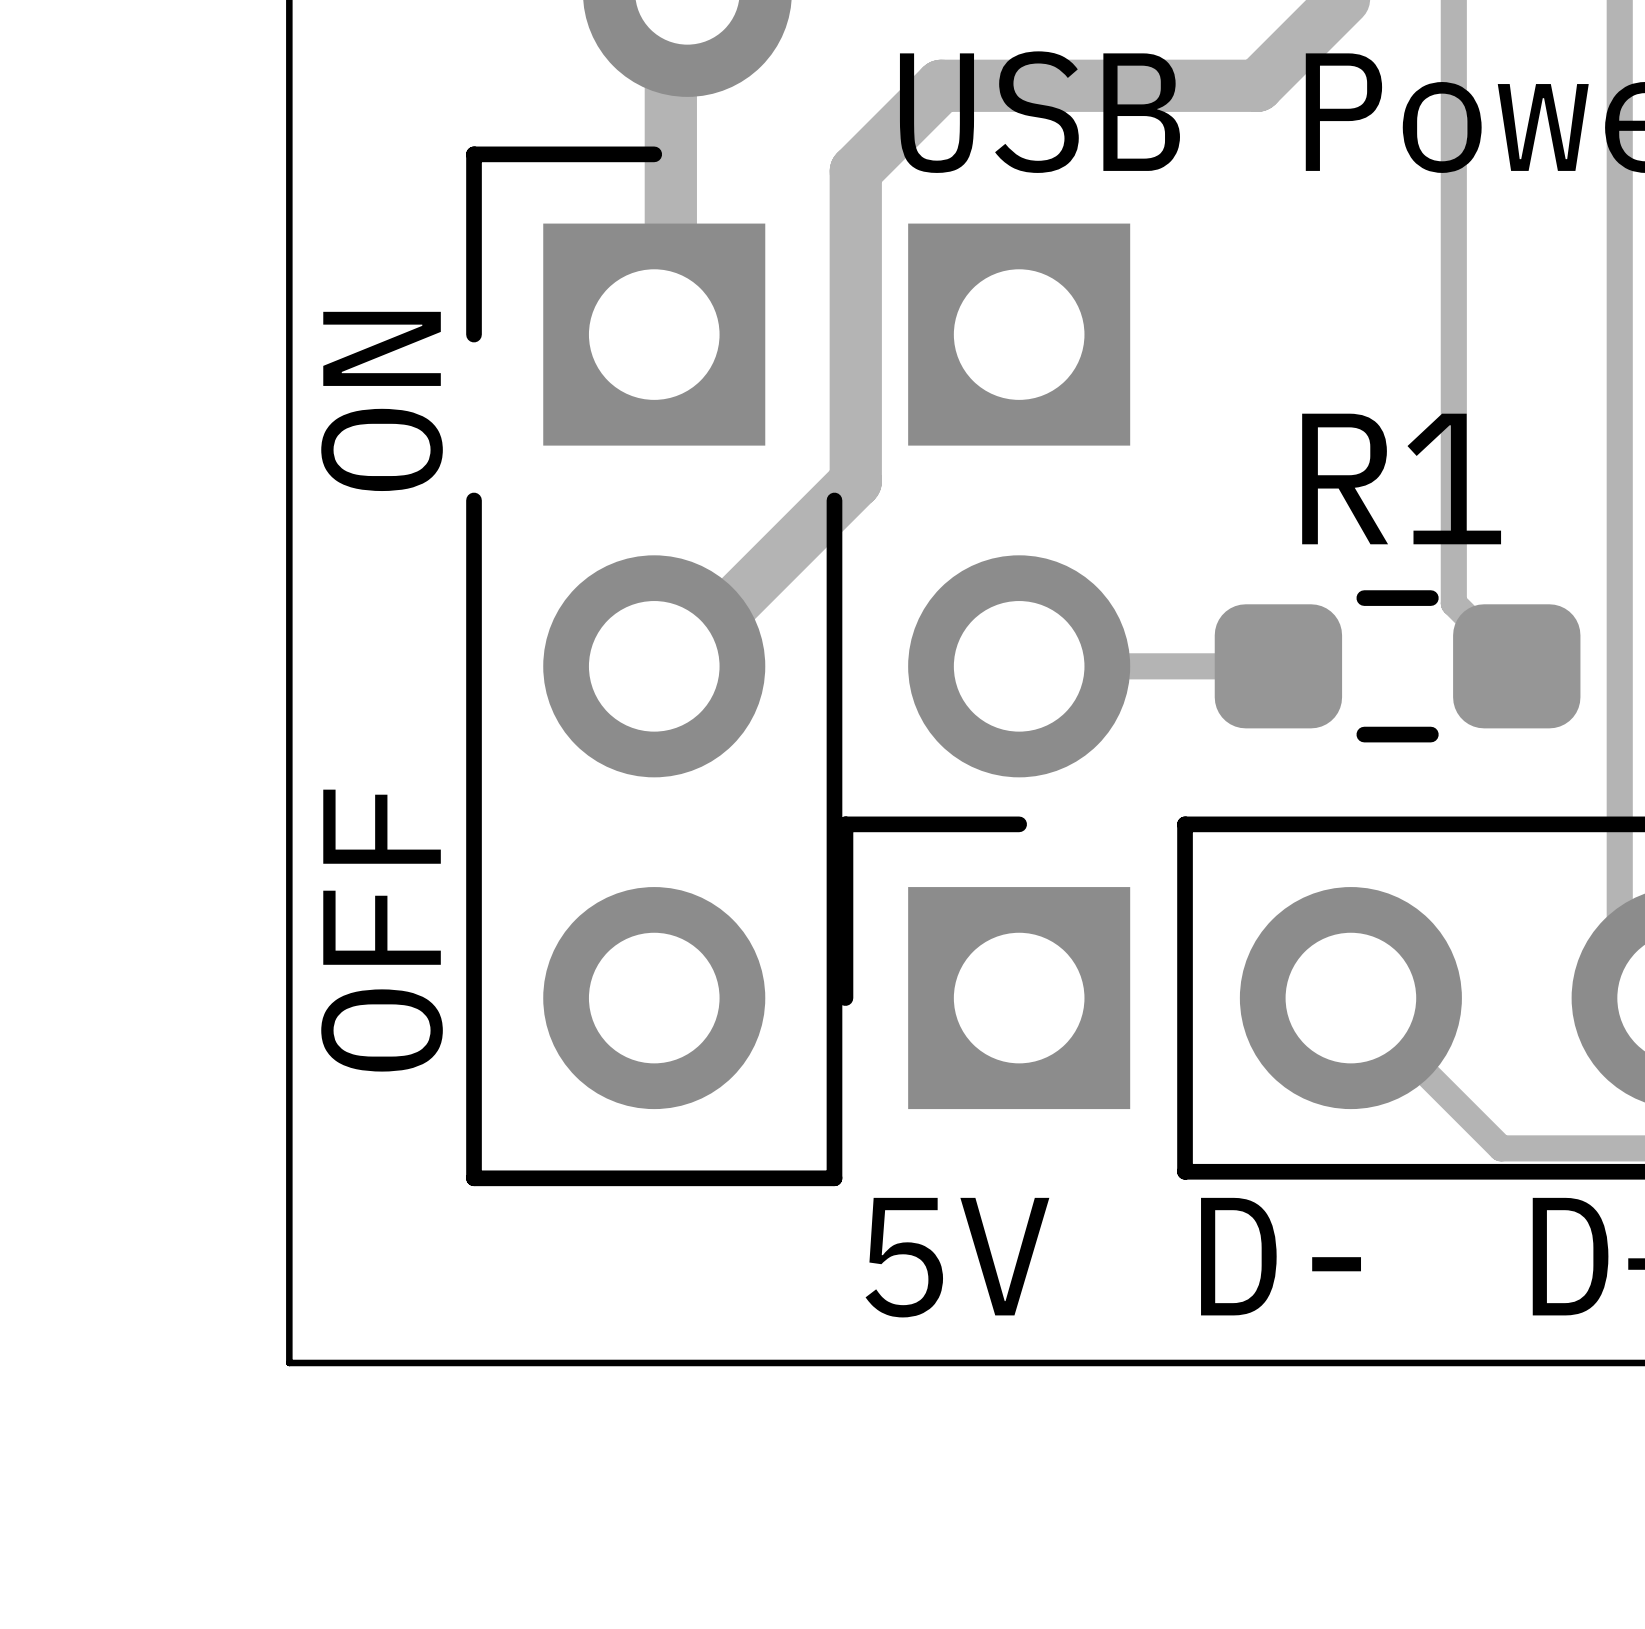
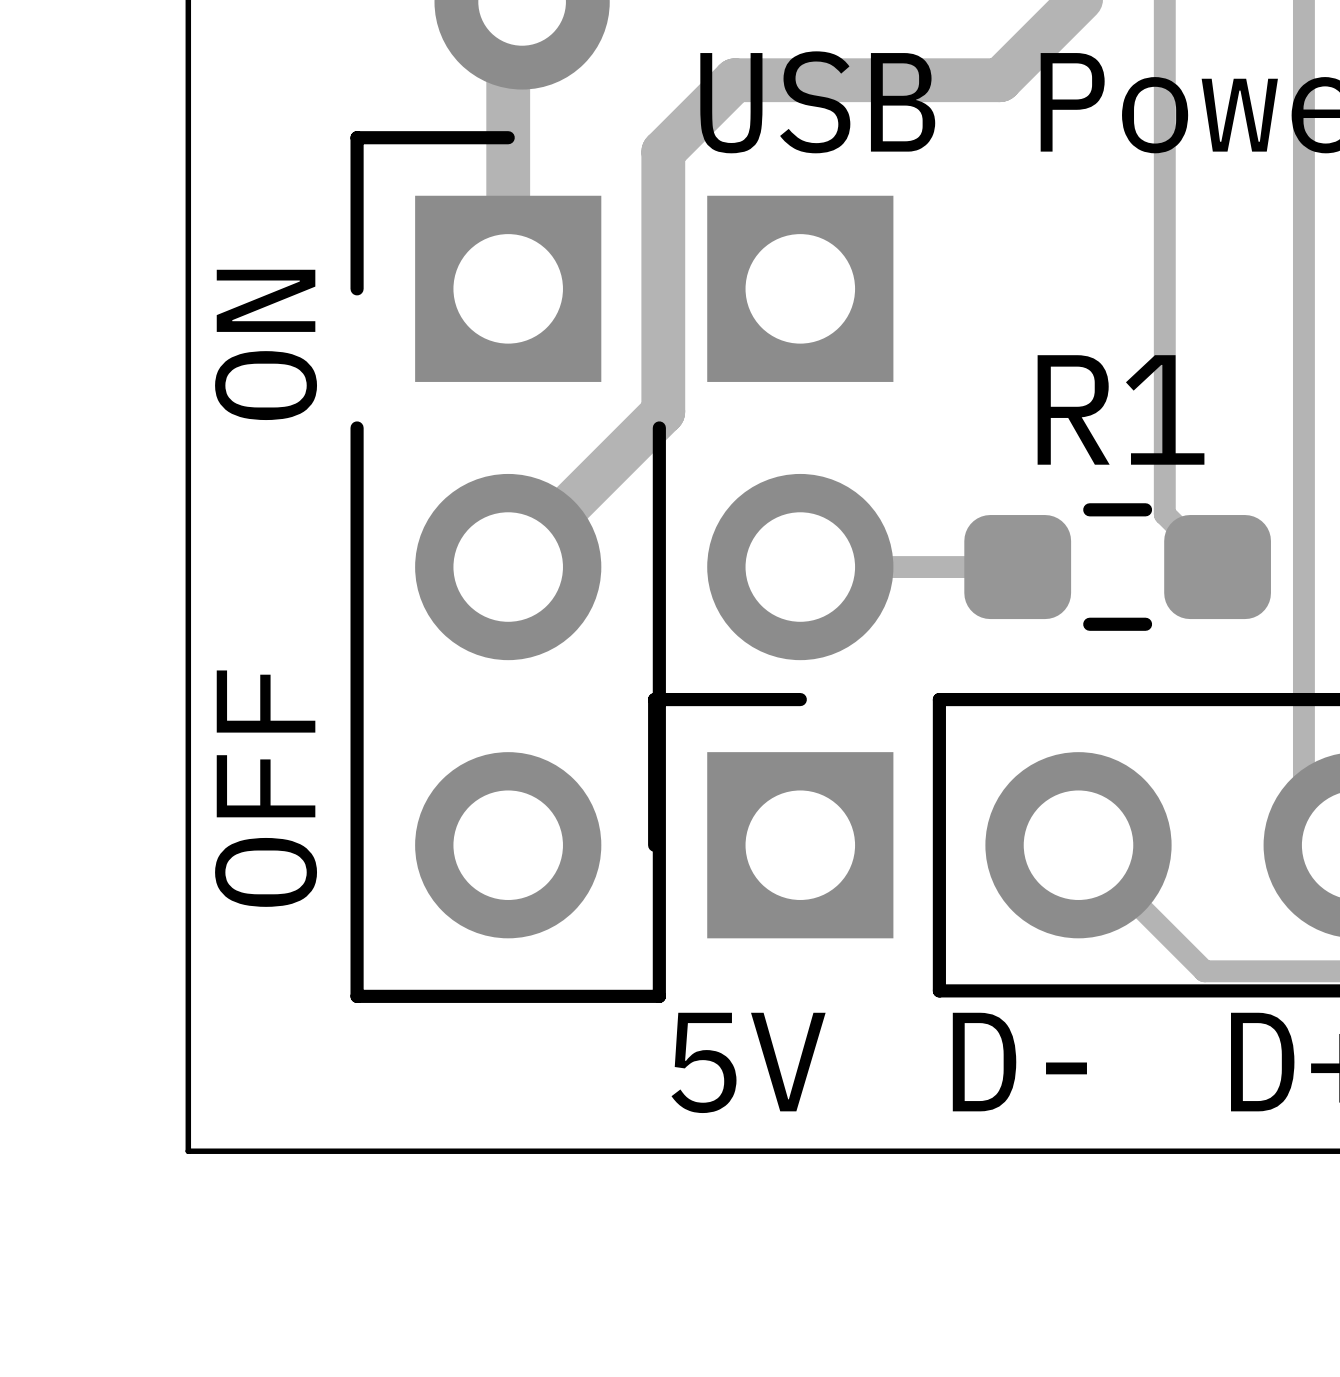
part position: (654, 666) -> (508, 567)

